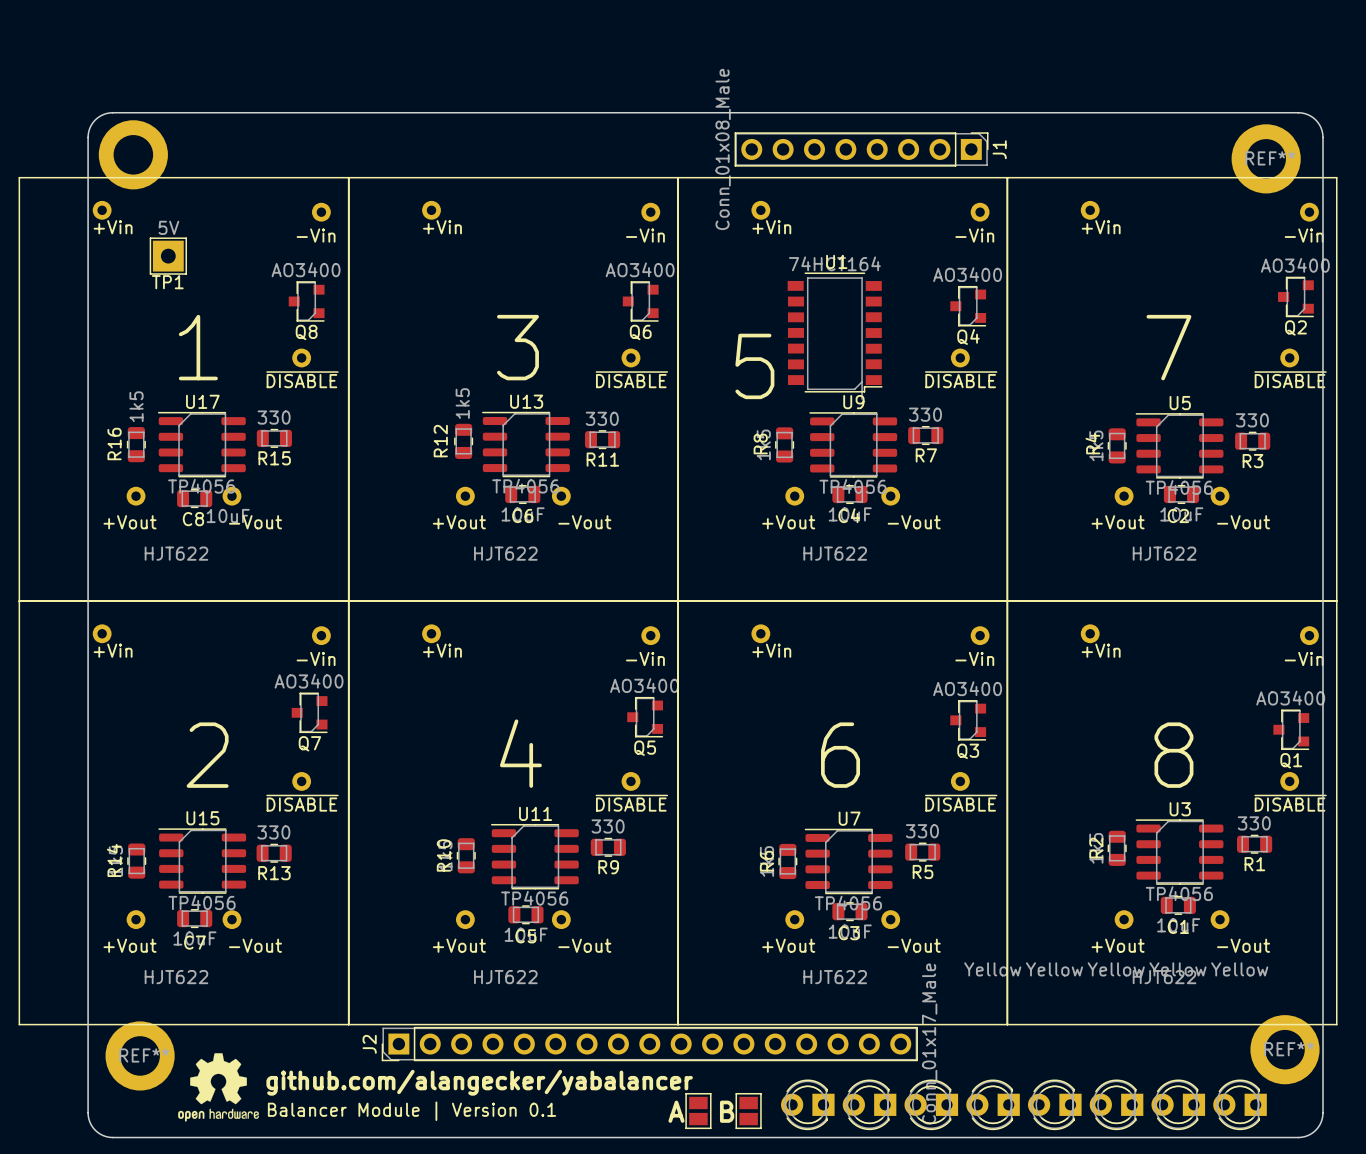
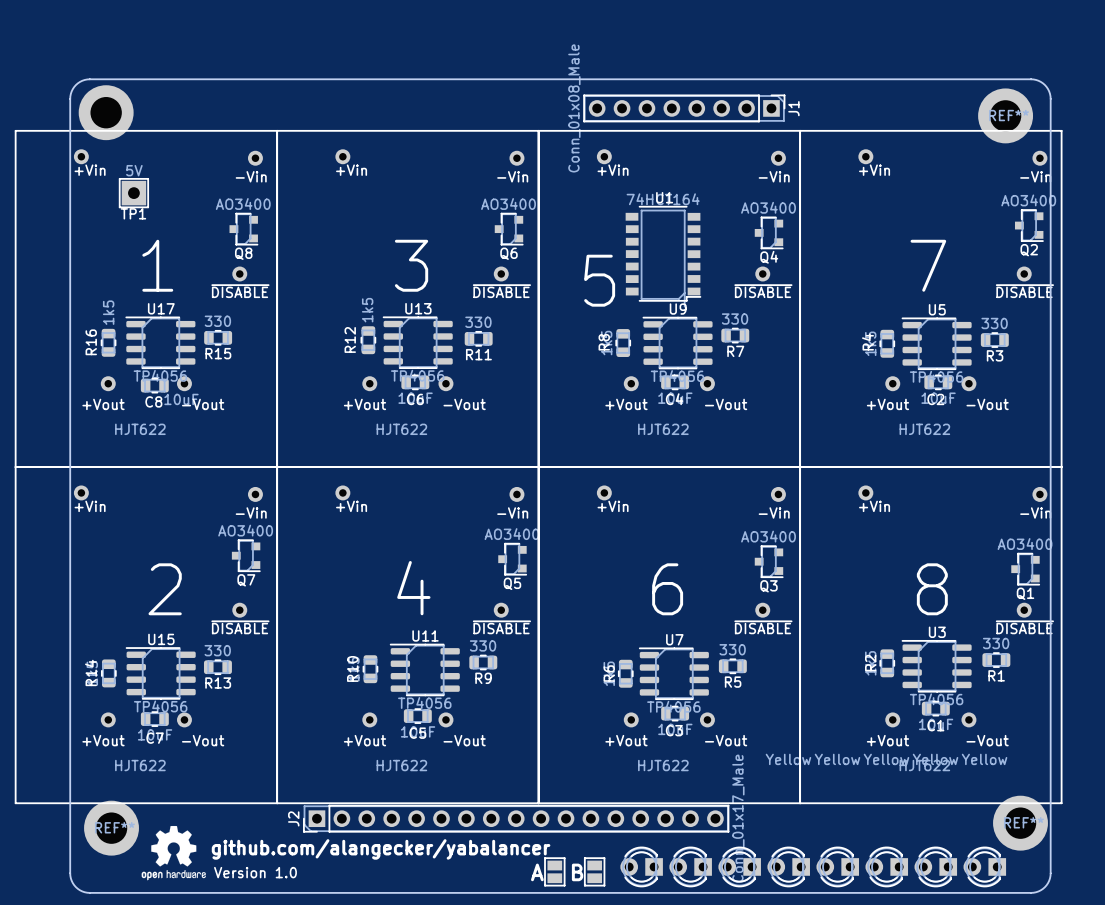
text: none -> Version 1.0 (255, 872)
text: Balancer Module | Version 0.1 (411, 1111) -> none

